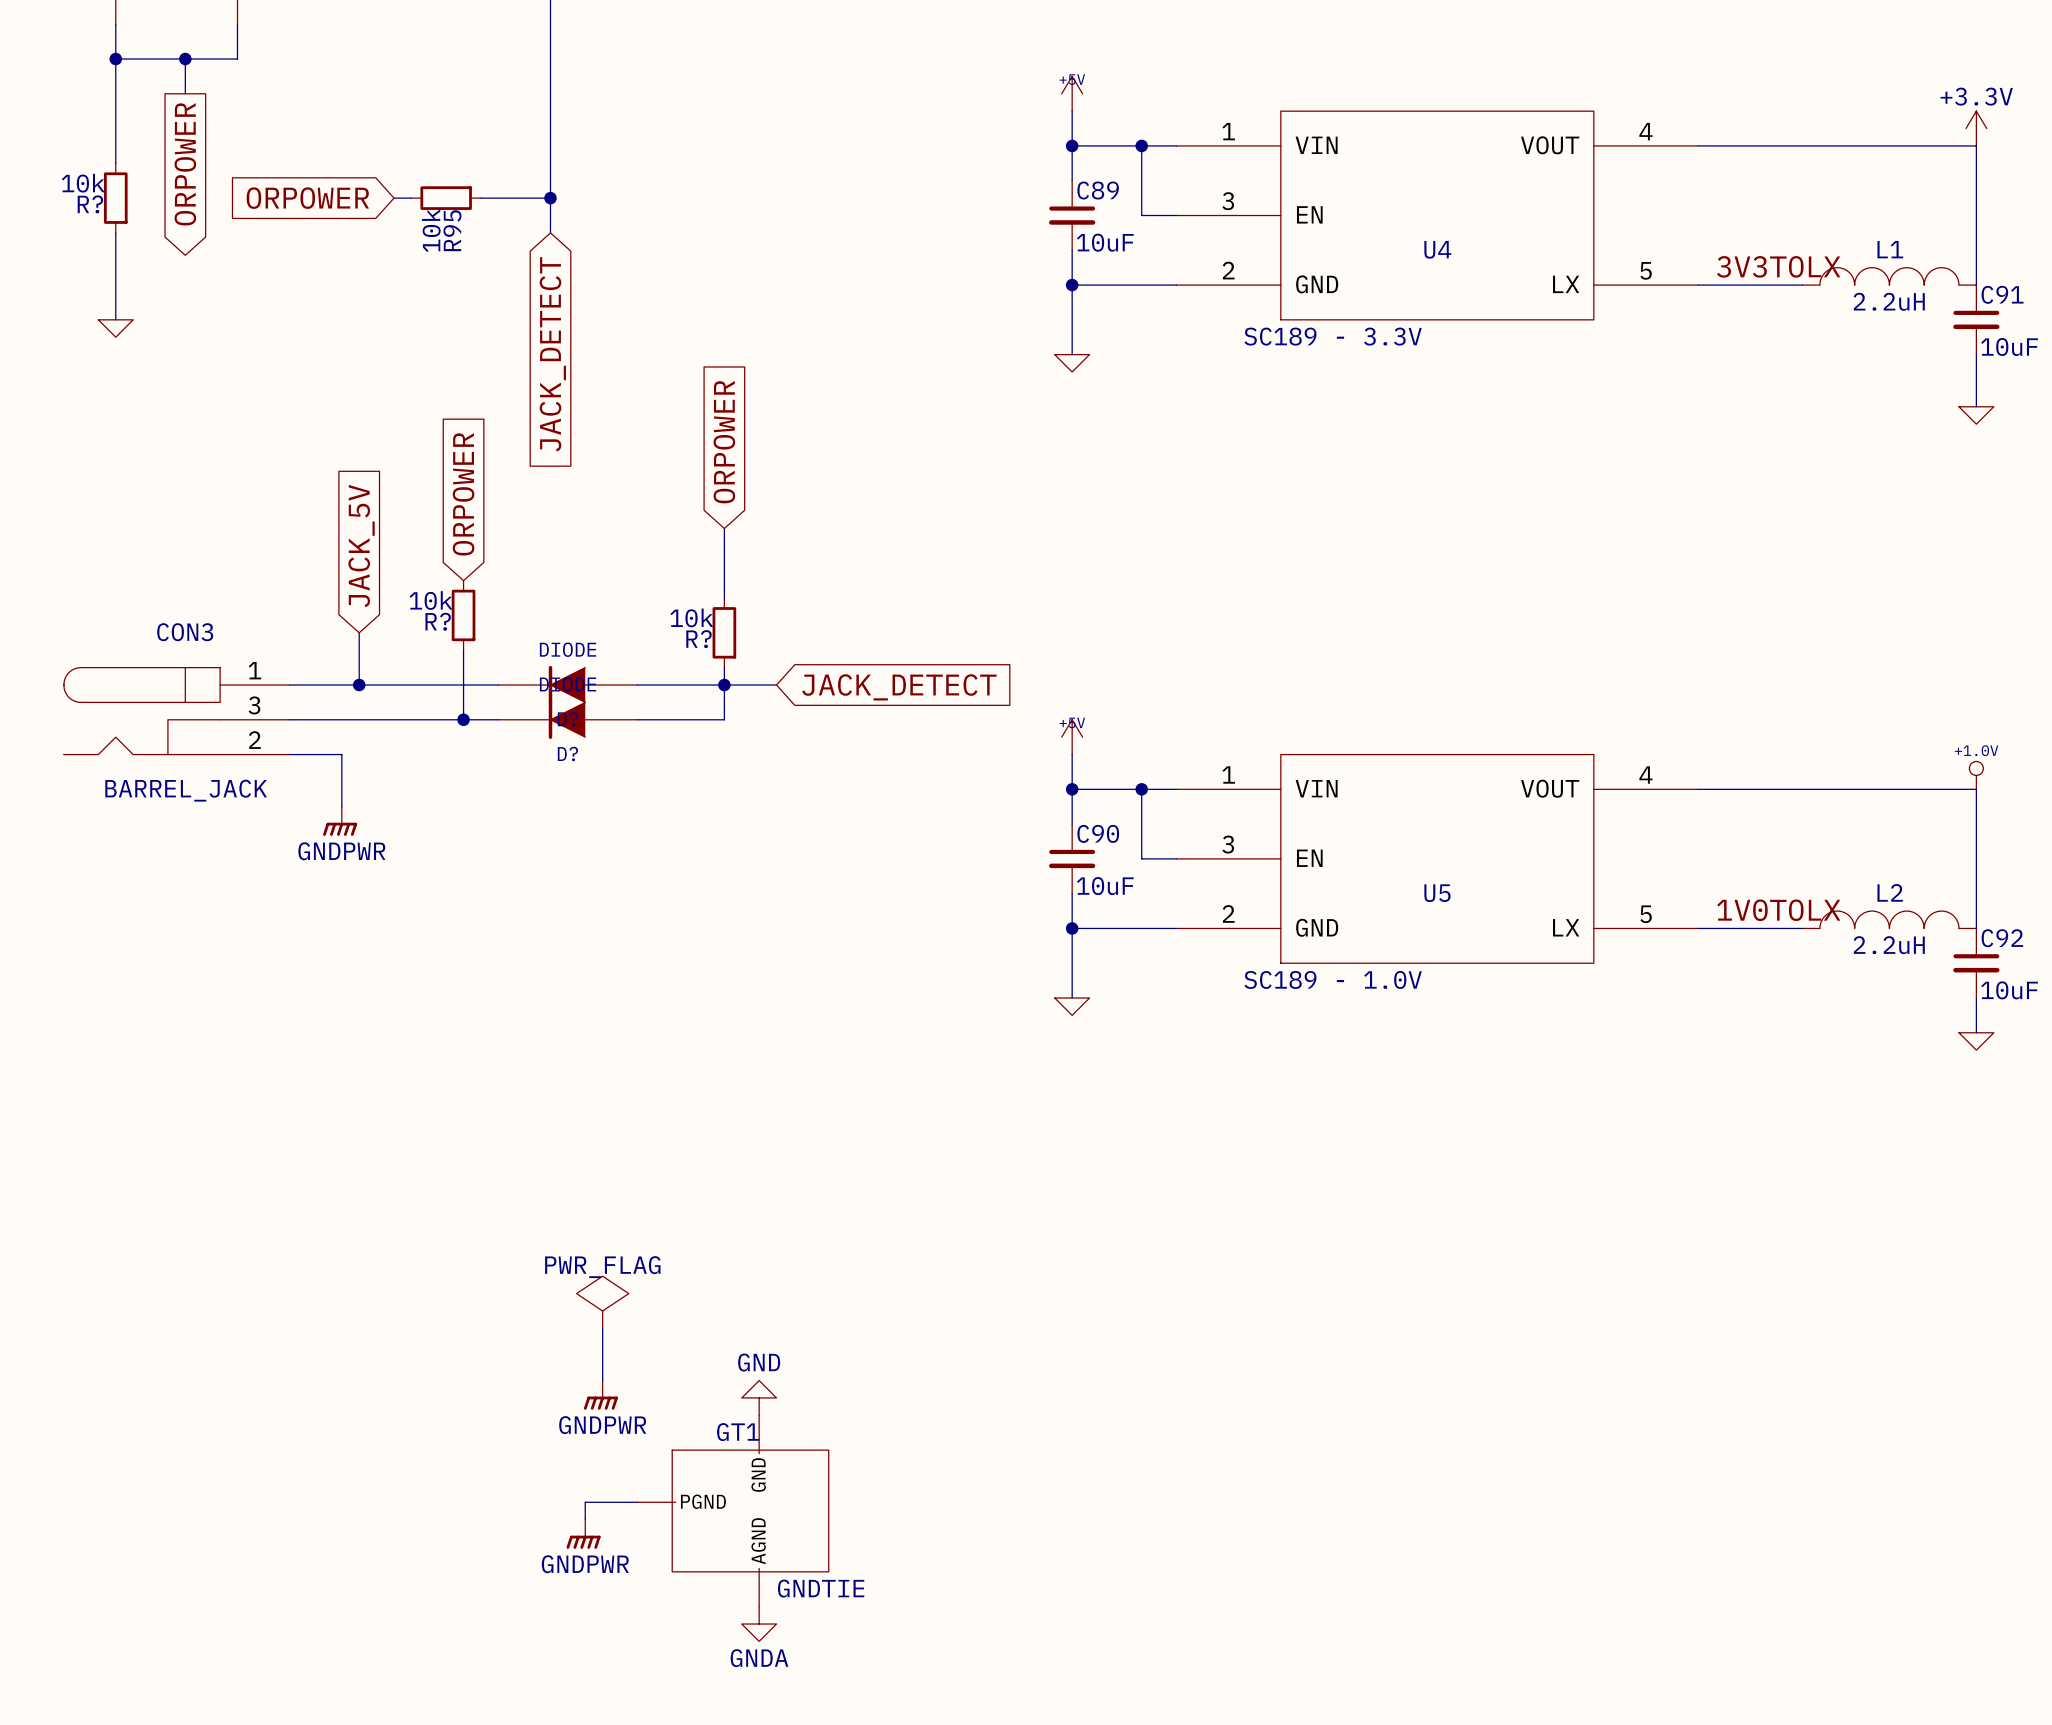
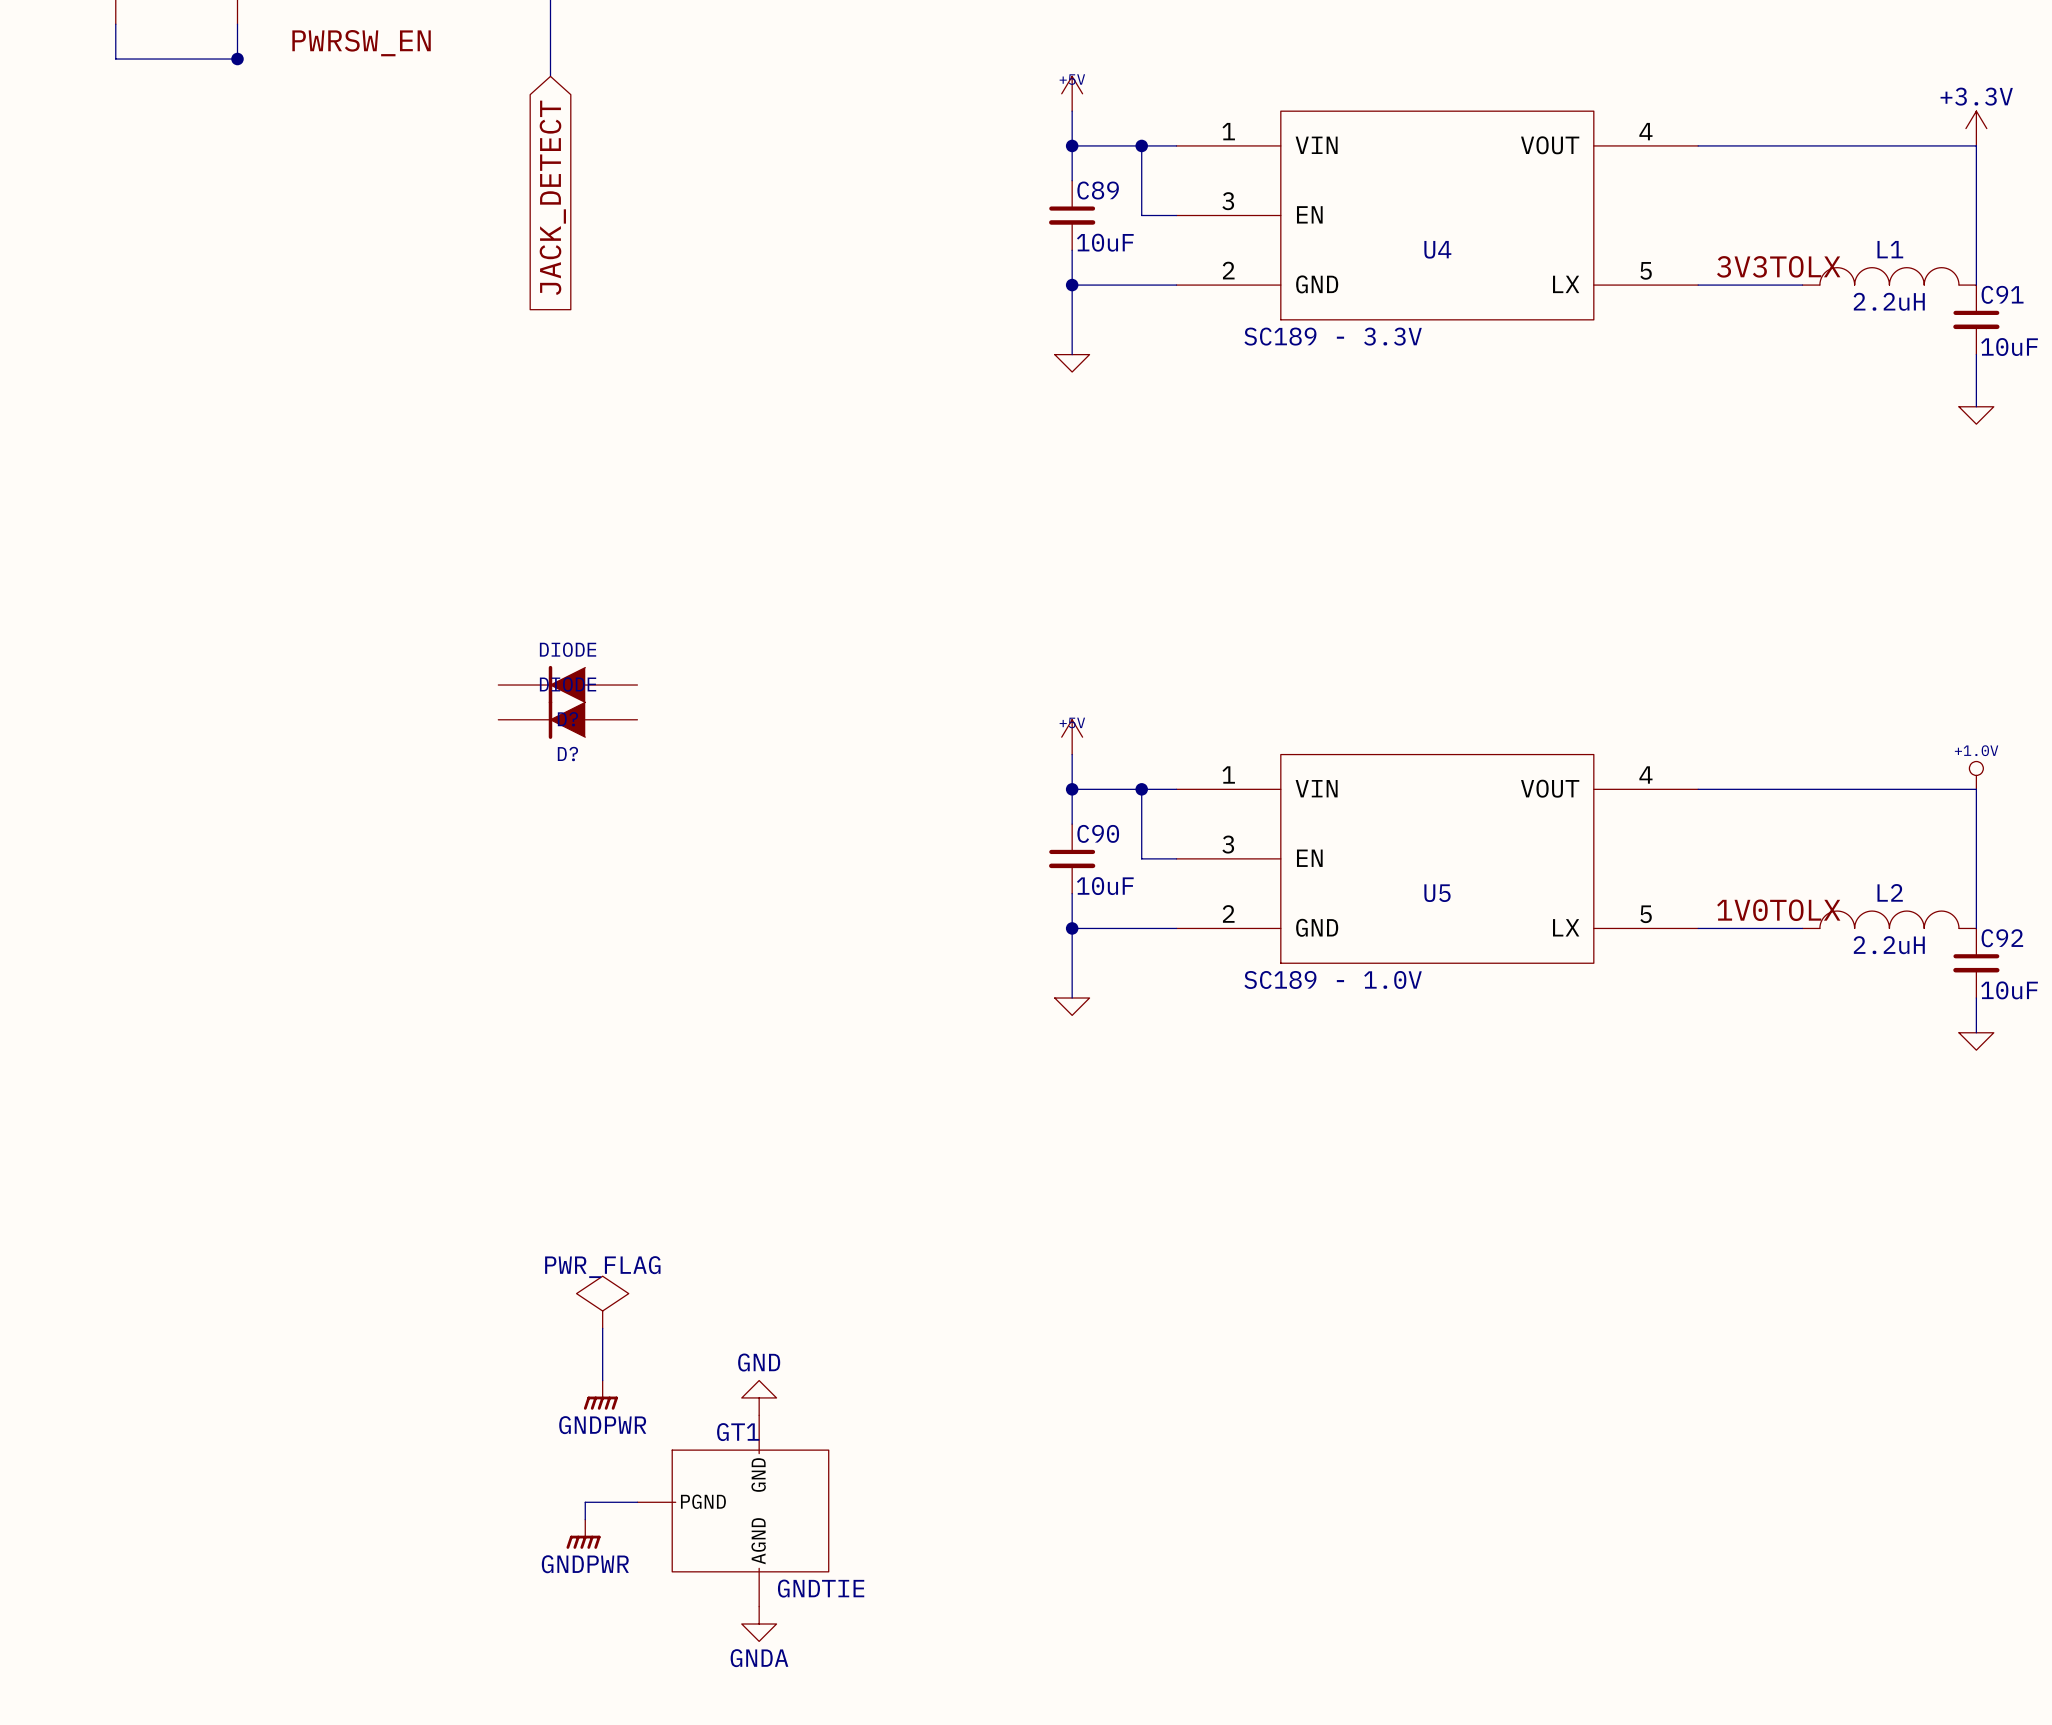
label: none -> PWRSW_EN (361, 43)
wire: (115, 59) (115, 163) -> none
junction: (115, 59) -> none
wire: (185, 59) (185, 93) -> none
junction position: (185, 59) -> (237, 59)
wire: (550, 76) (550, 232) -> none
global label: ORPOWER (185, 164) -> none
R?: 10k (115, 198) -> none
global label: ORPOWER (307, 198) -> none
wire: (393, 198) (411, 198) -> none
R95: 10k (446, 198) -> none
wire: (480, 198) (550, 198) -> none
junction: (550, 198) -> none
wire: (115, 232) (115, 319) -> none
power symbol: (115, 328) -> none
global label position: JACK_DETECT (552, 354) -> JACK_DETECT (552, 197)
global label: ORPOWER (724, 442) -> none
global label: ORPOWER (463, 494) -> none
wire: (724, 528) (724, 598) -> none
global label: JACK_5V (361, 546) -> none
R?: 10k (463, 615) -> none
wire: (359, 632) (359, 685) -> none
R?: 10k (724, 632) -> none
wire: (463, 650) (463, 719) -> none
wire: (724, 667) (724, 719) (637, 719) -> none
wire: (289, 685) (498, 685) -> none
junction: (359, 685) -> none
wire: (637, 685) (776, 685) -> none
junction: (724, 685) -> none
global label: JACK_DETECT (899, 687) -> none
CON3: BARREL_JACK (176, 711) -> none
wire: (289, 719) (498, 719) -> none
junction: (463, 719) -> none
wire: (289, 754) (341, 754) (341, 806) -> none
power symbol: GNDPWR (340, 821) -> none

